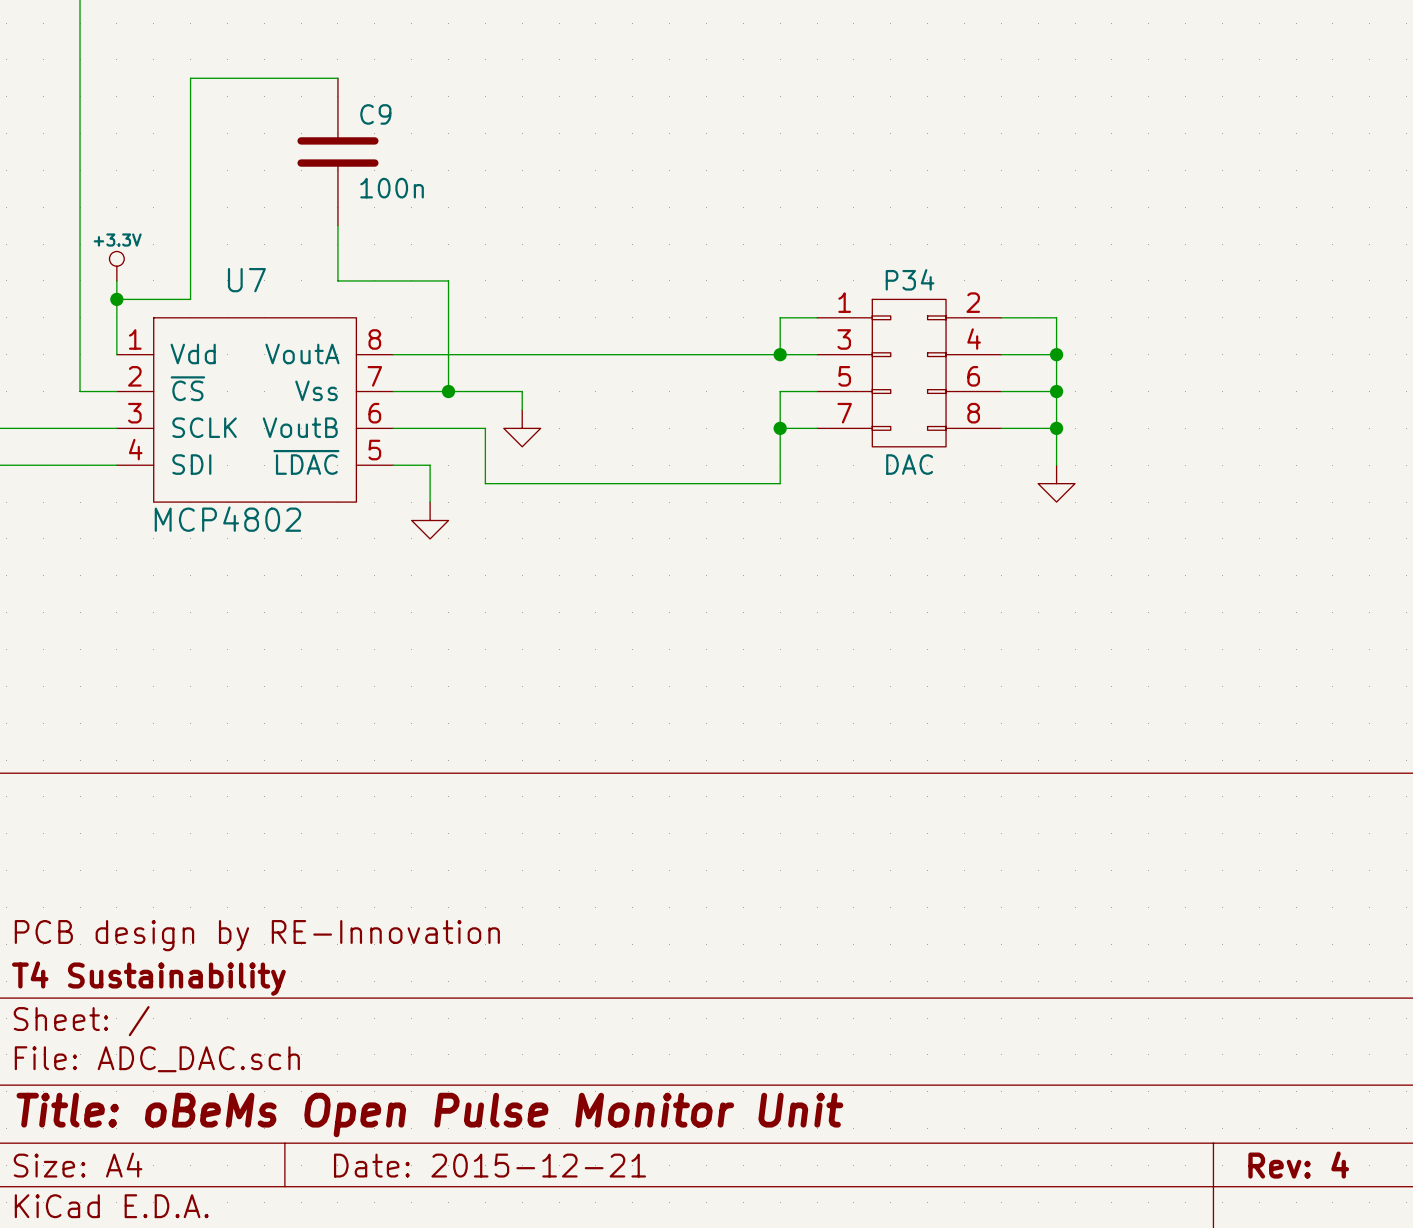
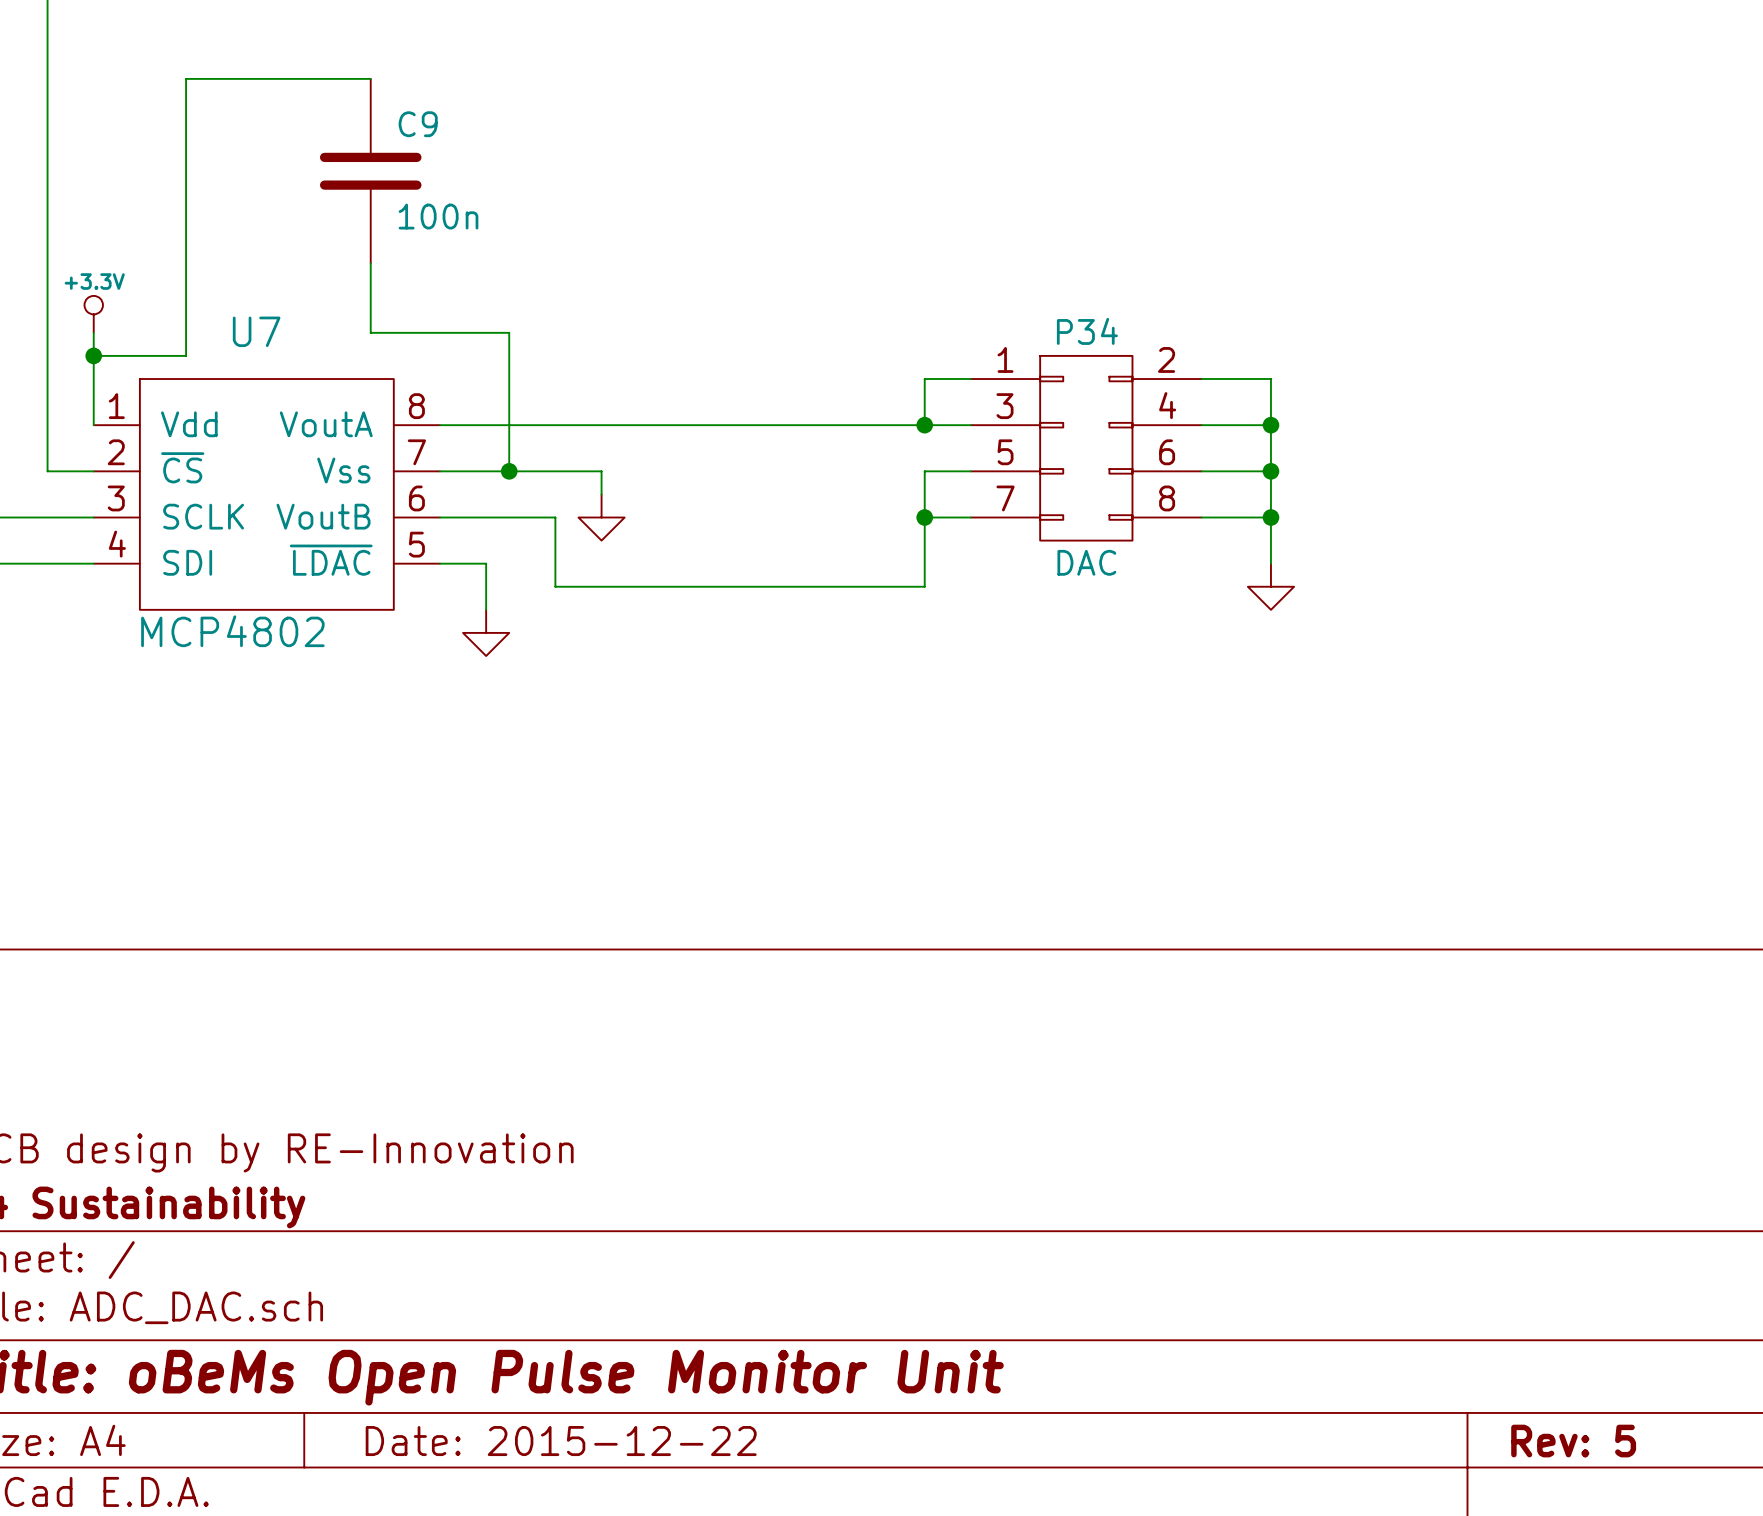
title block: Date: 2015-12-21 (489, 1165) -> Date: 2015-12-22 (561, 1441)
title block: Rev: 4 (1298, 1165) -> Rev: 5 (1573, 1441)

